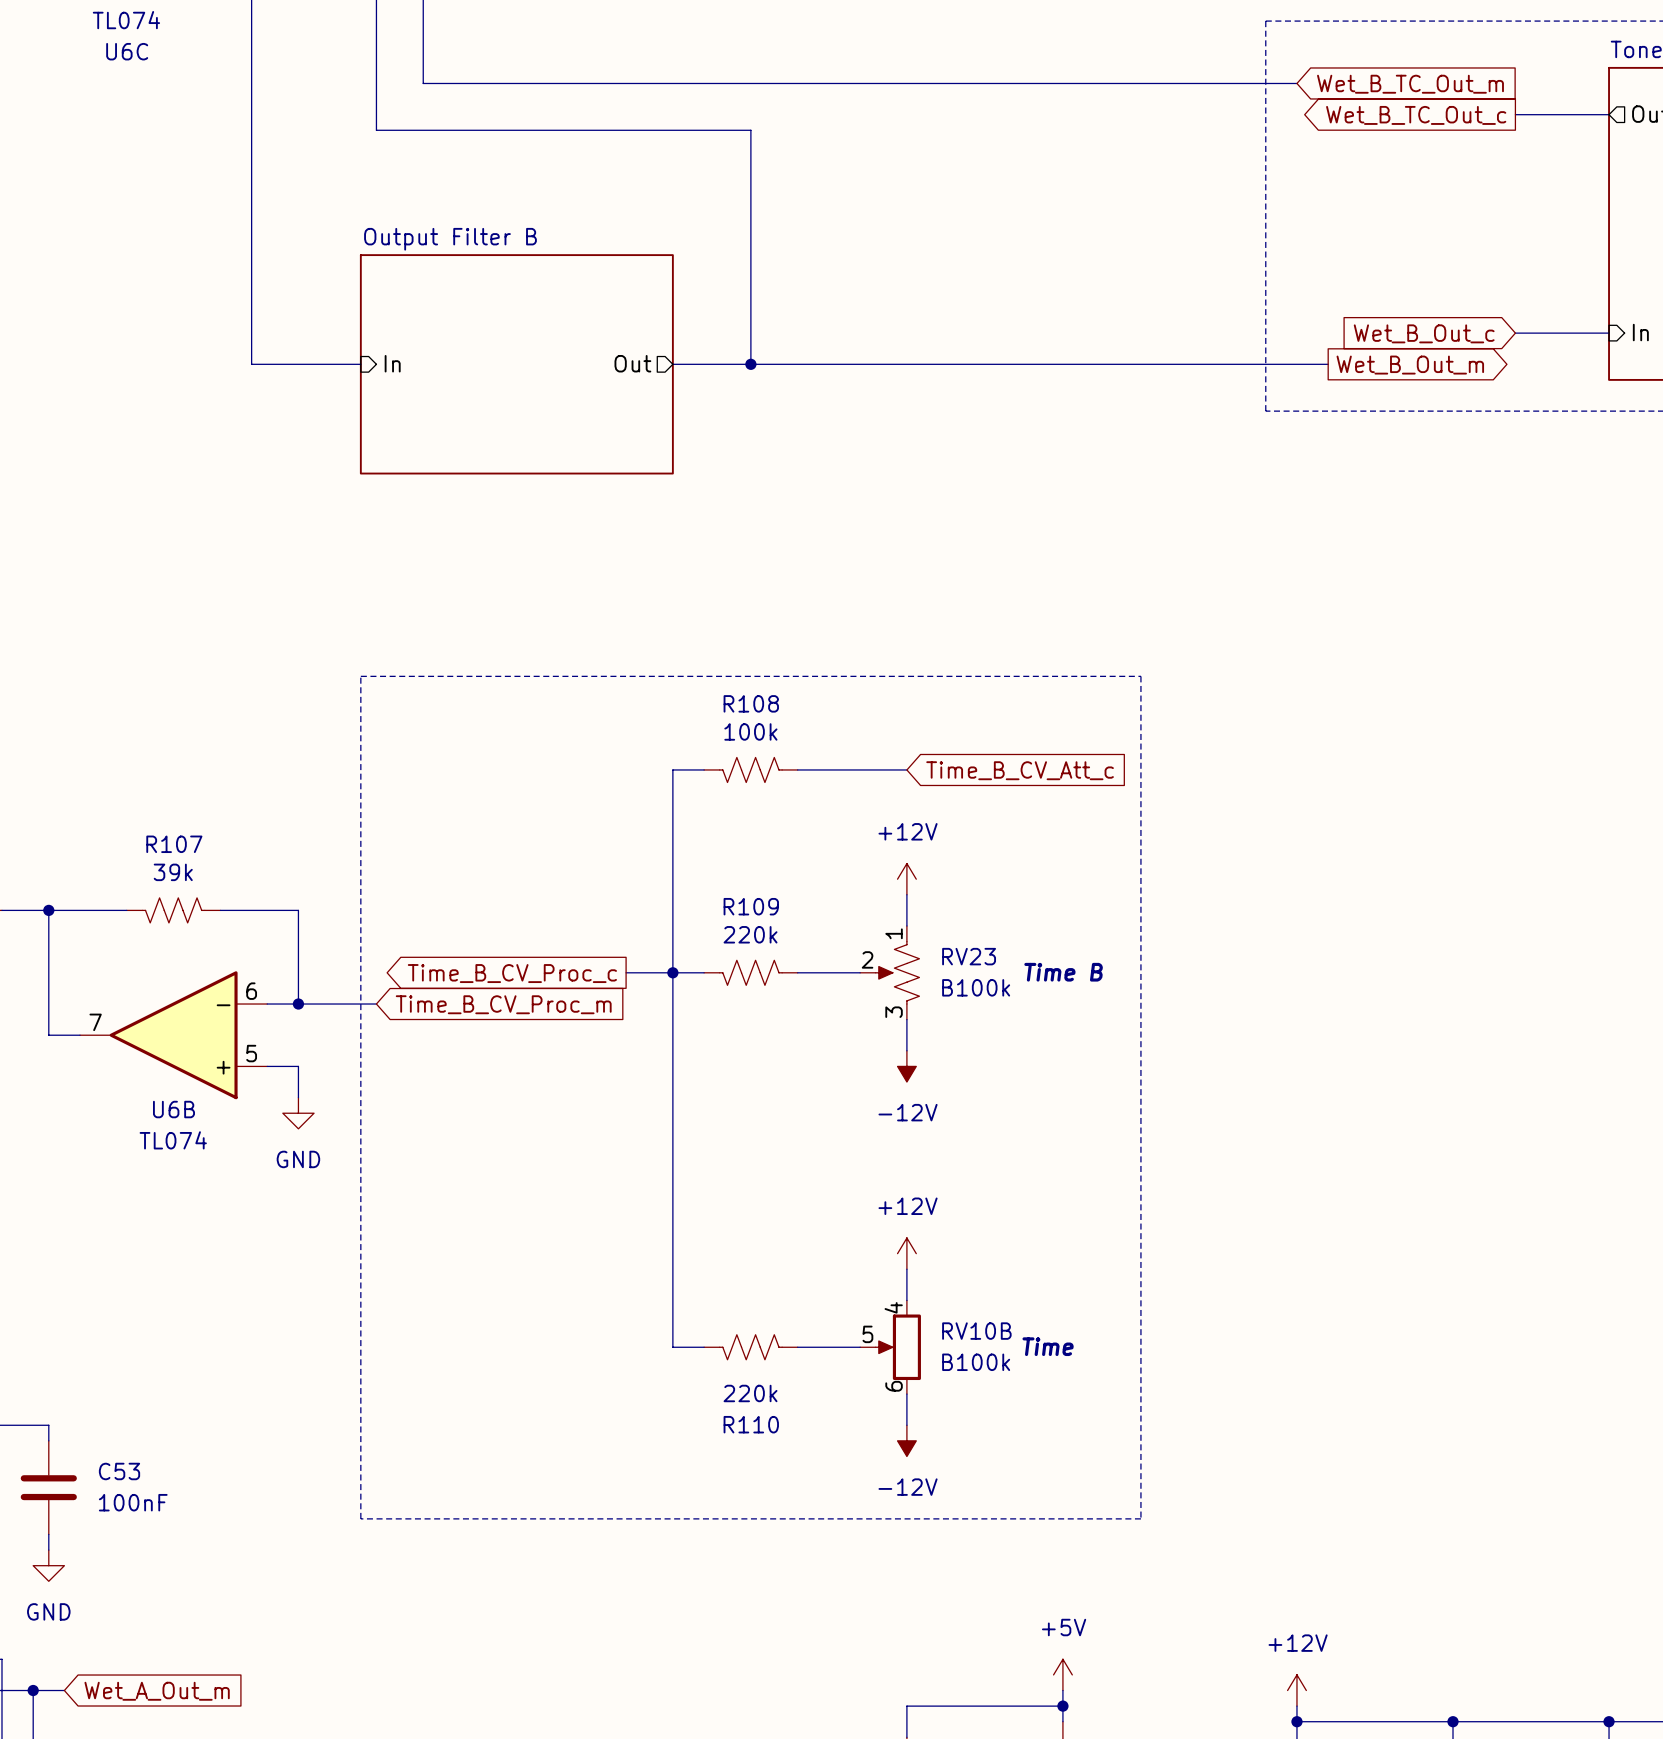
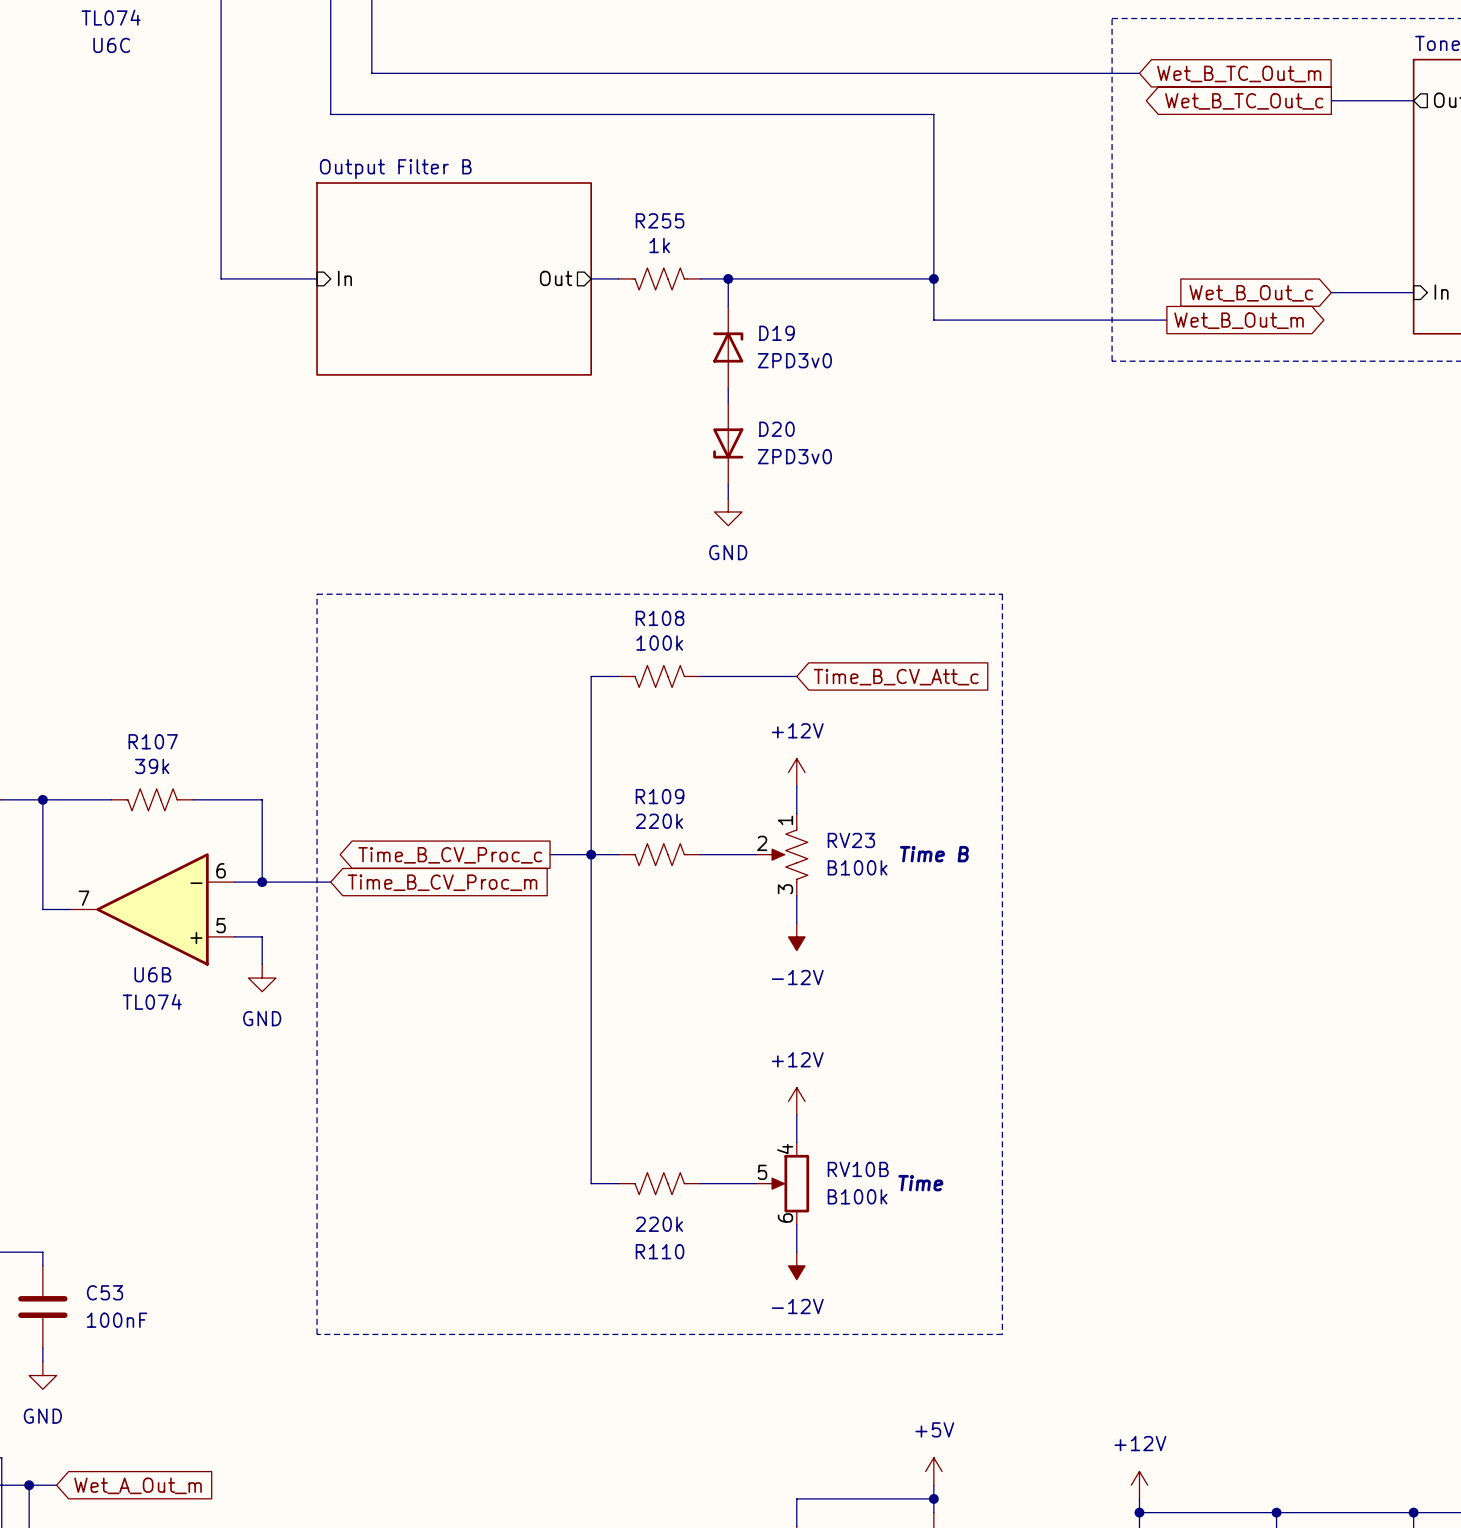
wire: (750, 130) (750, 364) -> none
wire: (251, 317) (251, 364) (360, 364) -> (221, 278) (317, 278)
wire: none -> (591, 278) (618, 278)
R255: none -> 1k (659, 278)
wire: none -> (700, 278) (933, 278)
wire: none -> (728, 278) (728, 306)
junction: none -> (728, 278)
junction: none -> (933, 278)
sheet pin position: In (392, 363) -> In (344, 278)
sheet pin position: Out (632, 363) -> Out (556, 278)
sheet Output Filter B position: (516, 364) -> (454, 278)
wire: (672, 364) (1062, 364) -> (659, 114) (933, 114) (933, 320)
junction: (750, 364) -> none
D19: none -> ZPD3v0 (728, 347)
wire: none -> (728, 388) (728, 402)
D20: none -> ZPD3v0 (728, 443)
wire: none -> (728, 484) (728, 498)
power symbol: none -> GND (728, 511)

